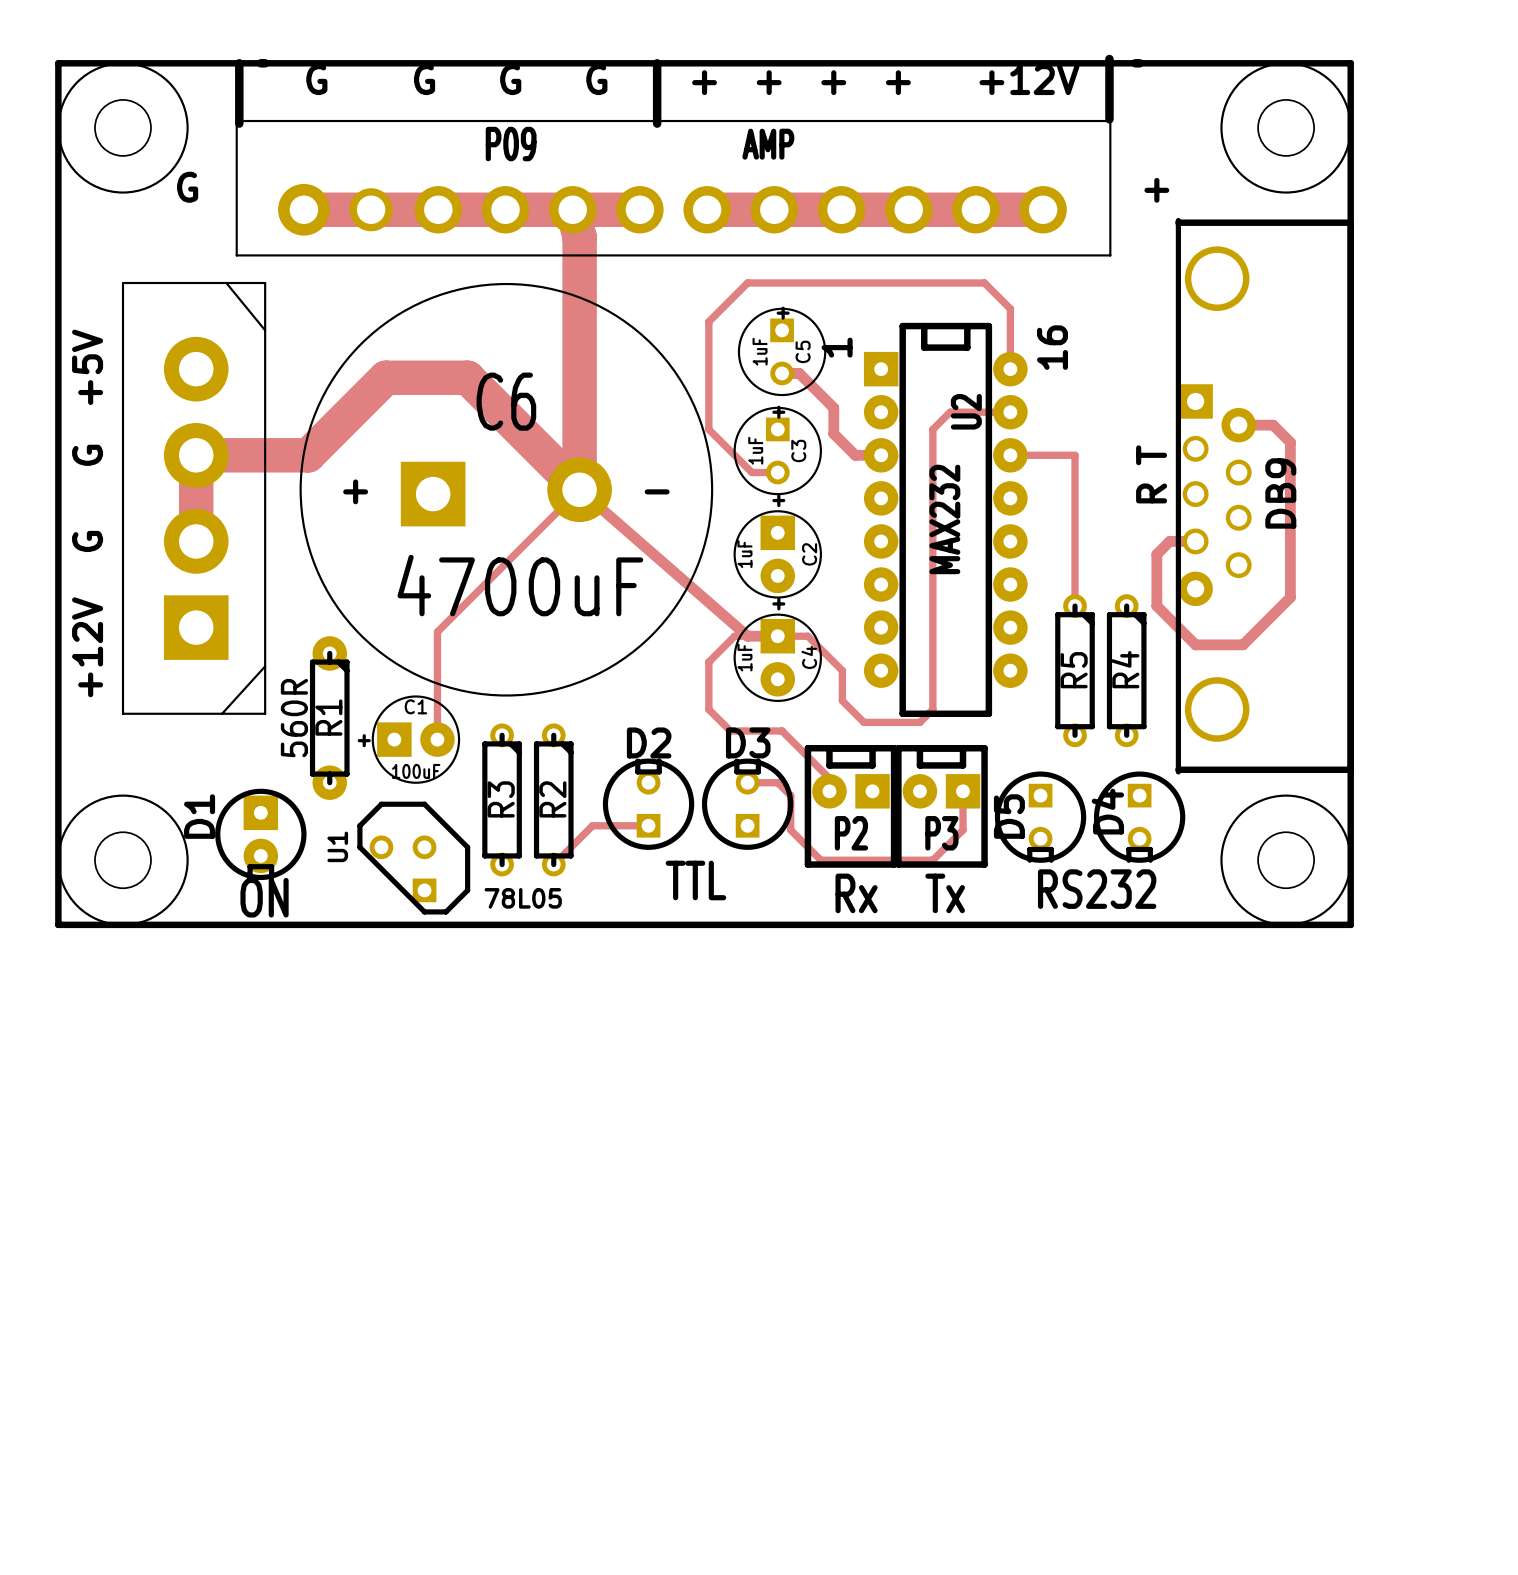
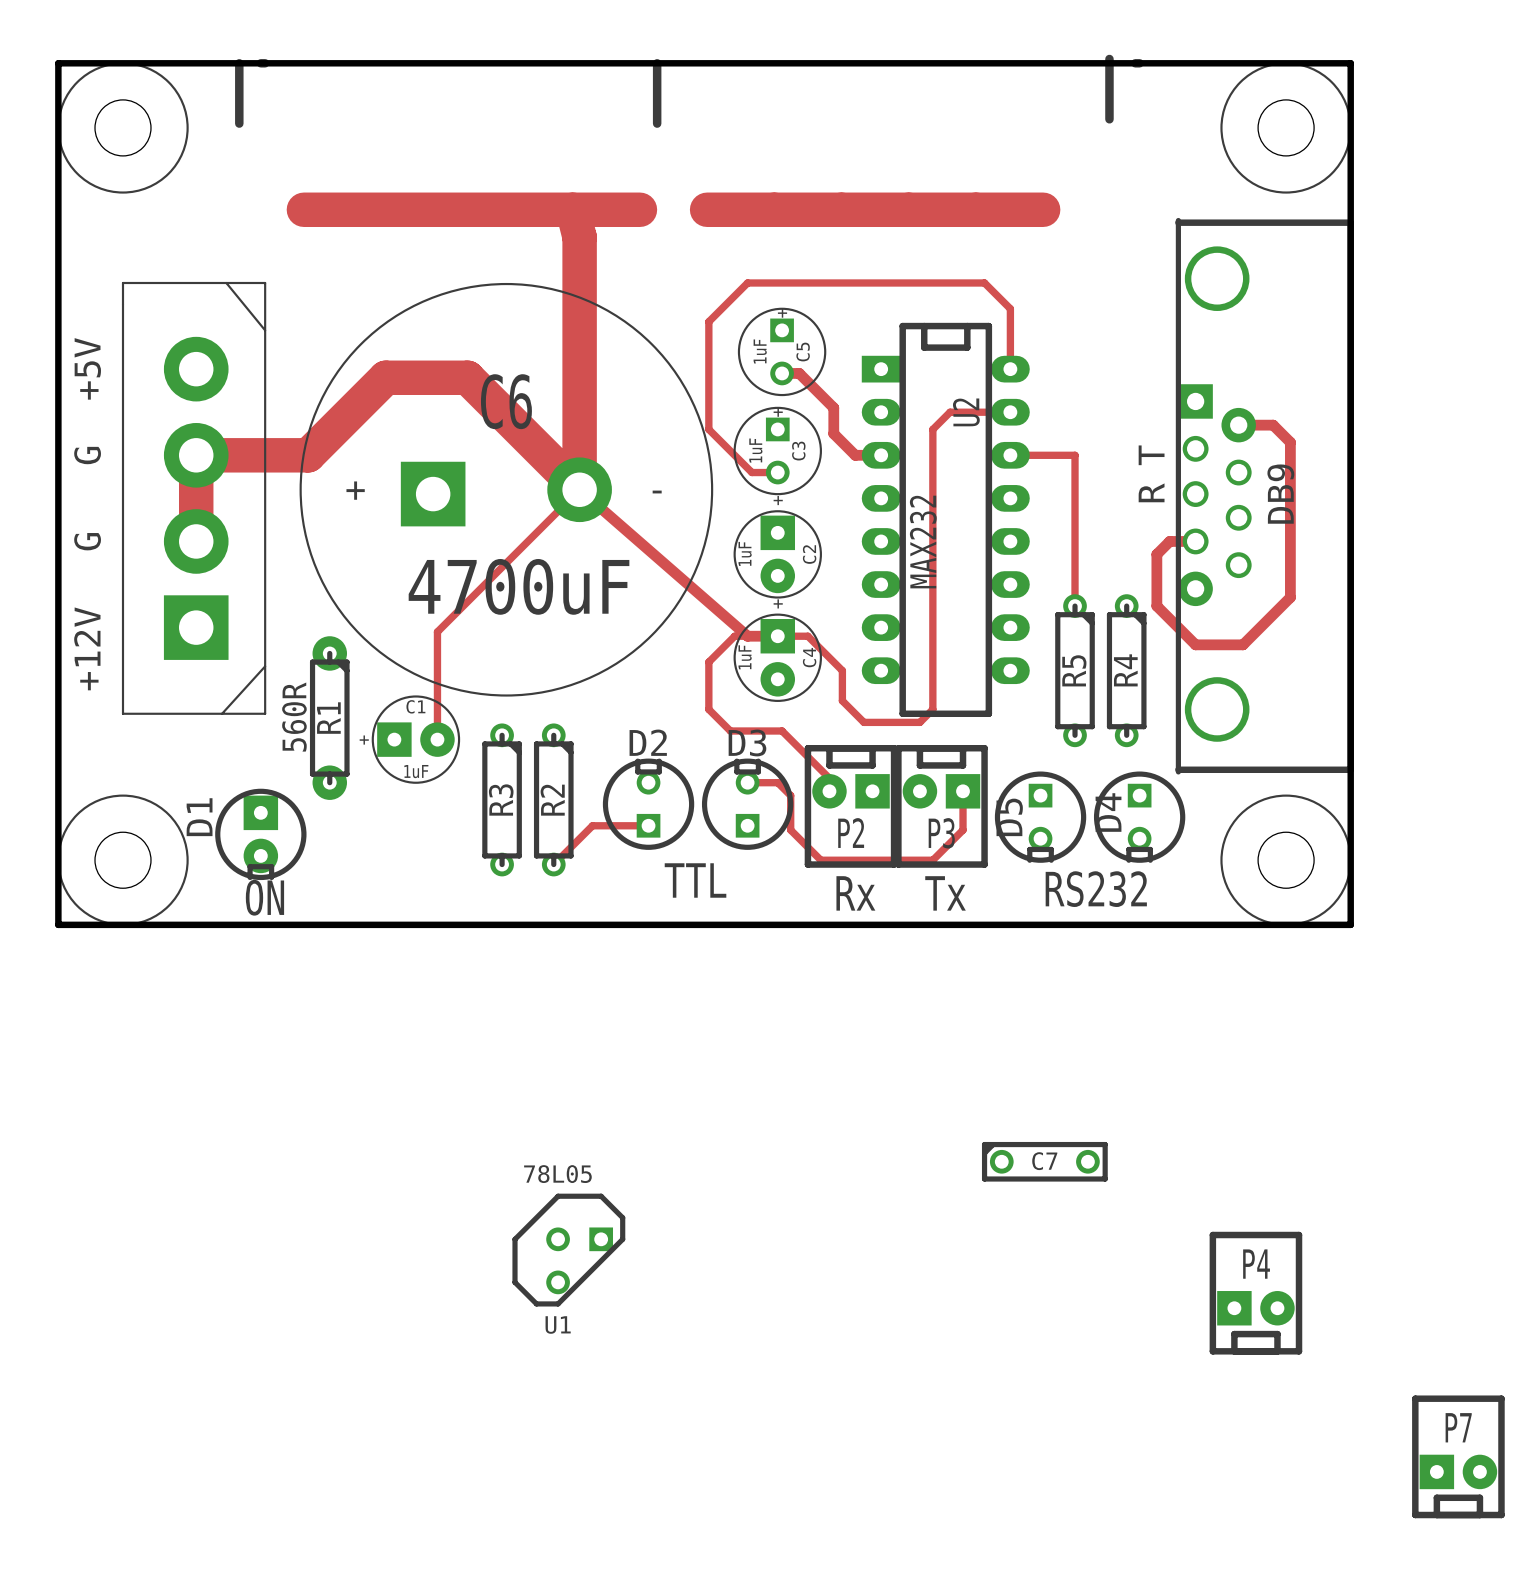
P09: AMP (673, 188) -> none
U2 footprint: [863, 322, 1028, 718] -> [861, 322, 1030, 718]
C1 value: 100uF (416, 771) -> 1uF (416, 771)
U1 rotation: 0° (413, 858) -> 90° counterclockwise (568, 1250)
U1 position: (413, 858) -> (568, 1250)
U1 value position: 78L05 (523, 898) -> 78L05 (557, 1174)
C7: none -> (1044, 1161)
P4: none -> (1255, 1293)
P7: none -> (1458, 1456)

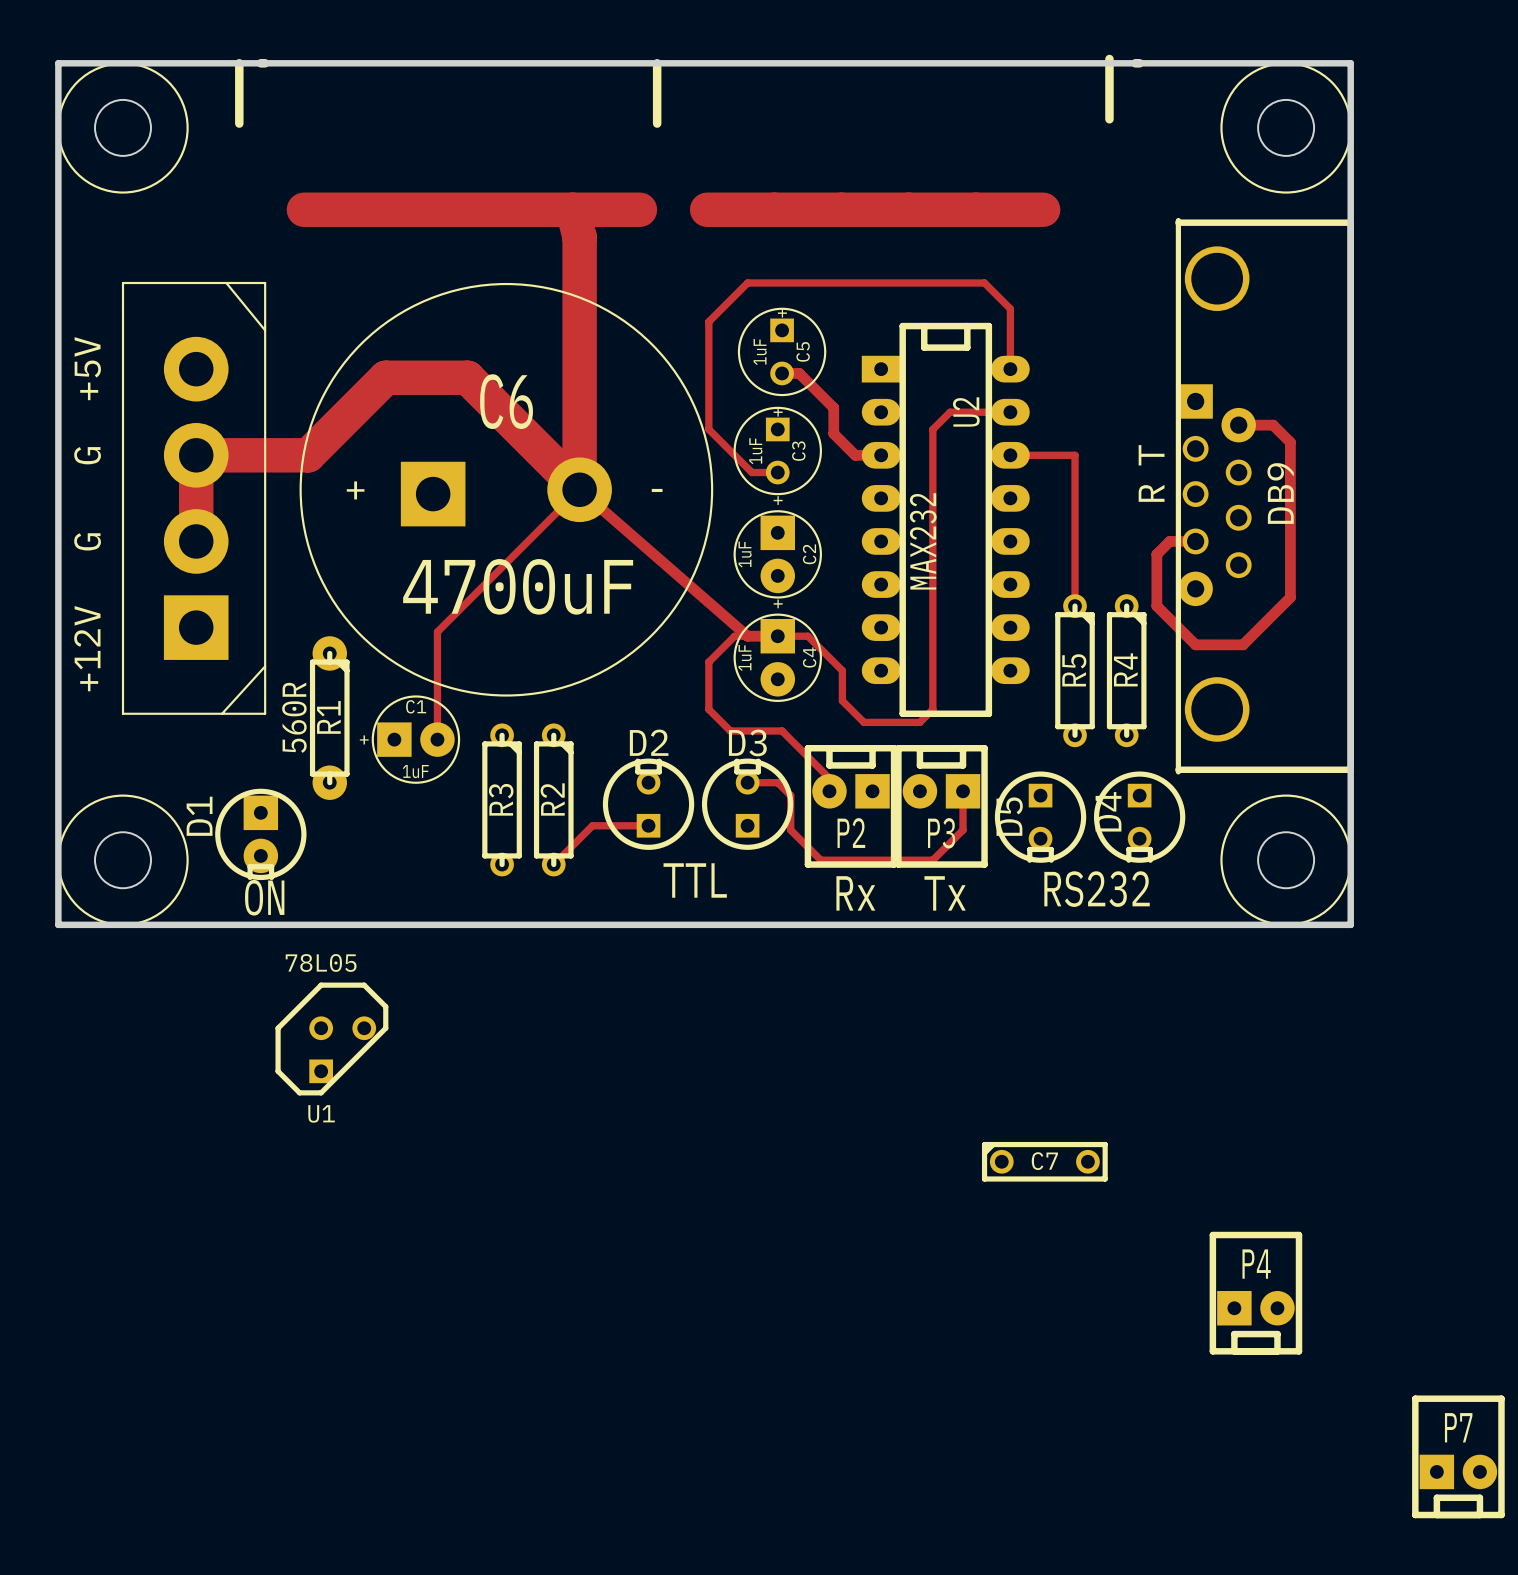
U1 footprint: [512, 1193, 626, 1307] -> [275, 982, 389, 1096]

